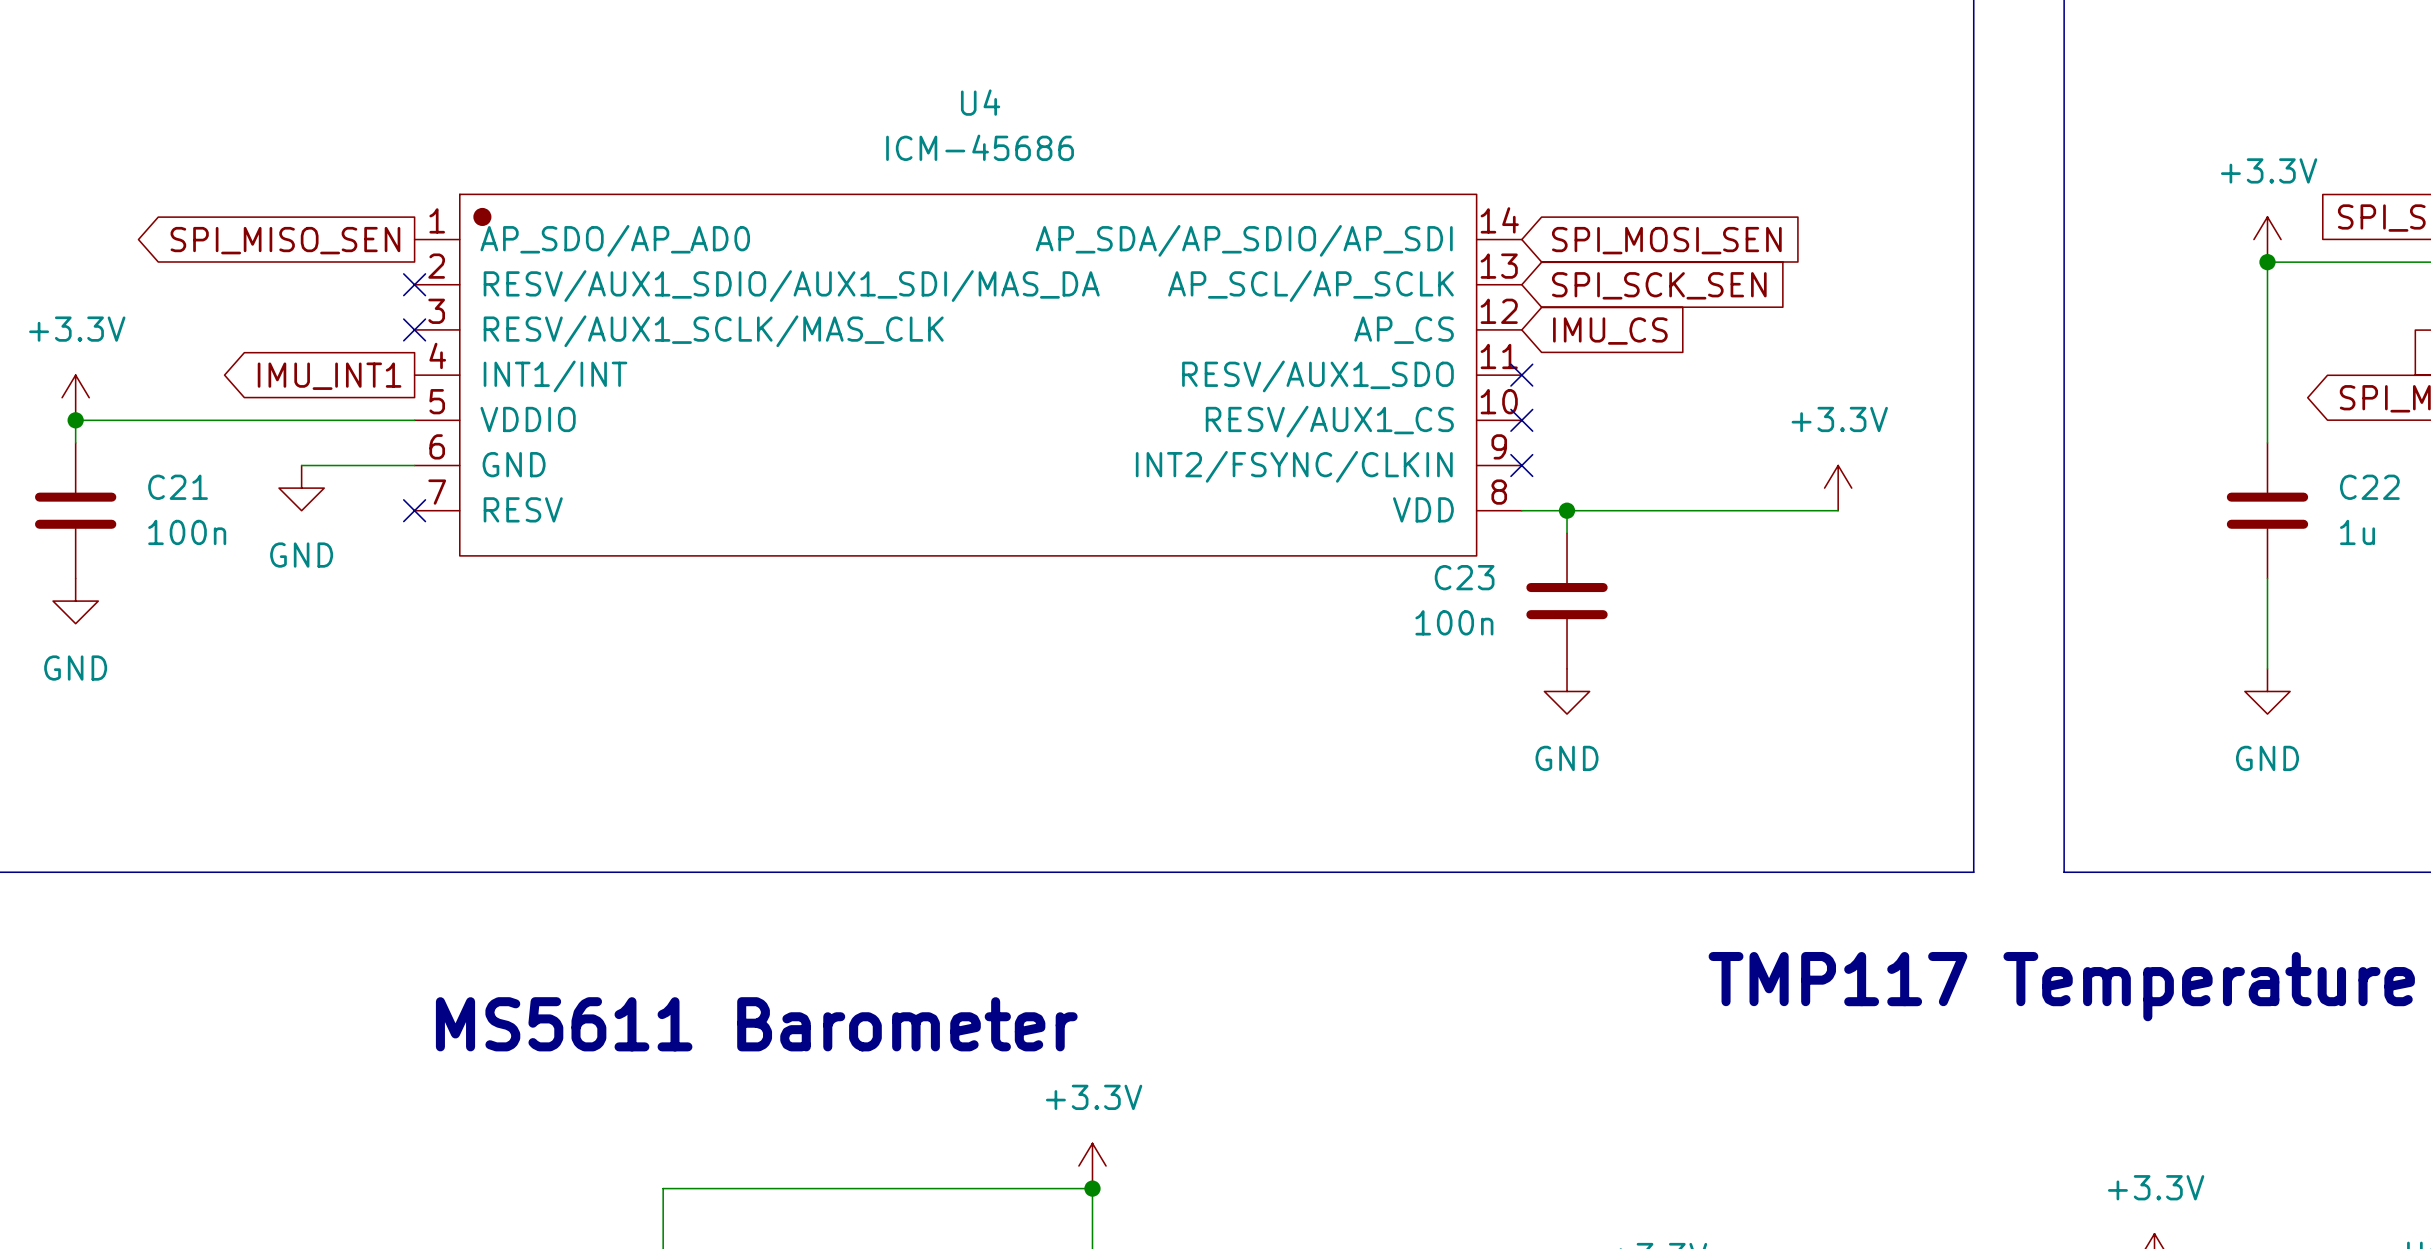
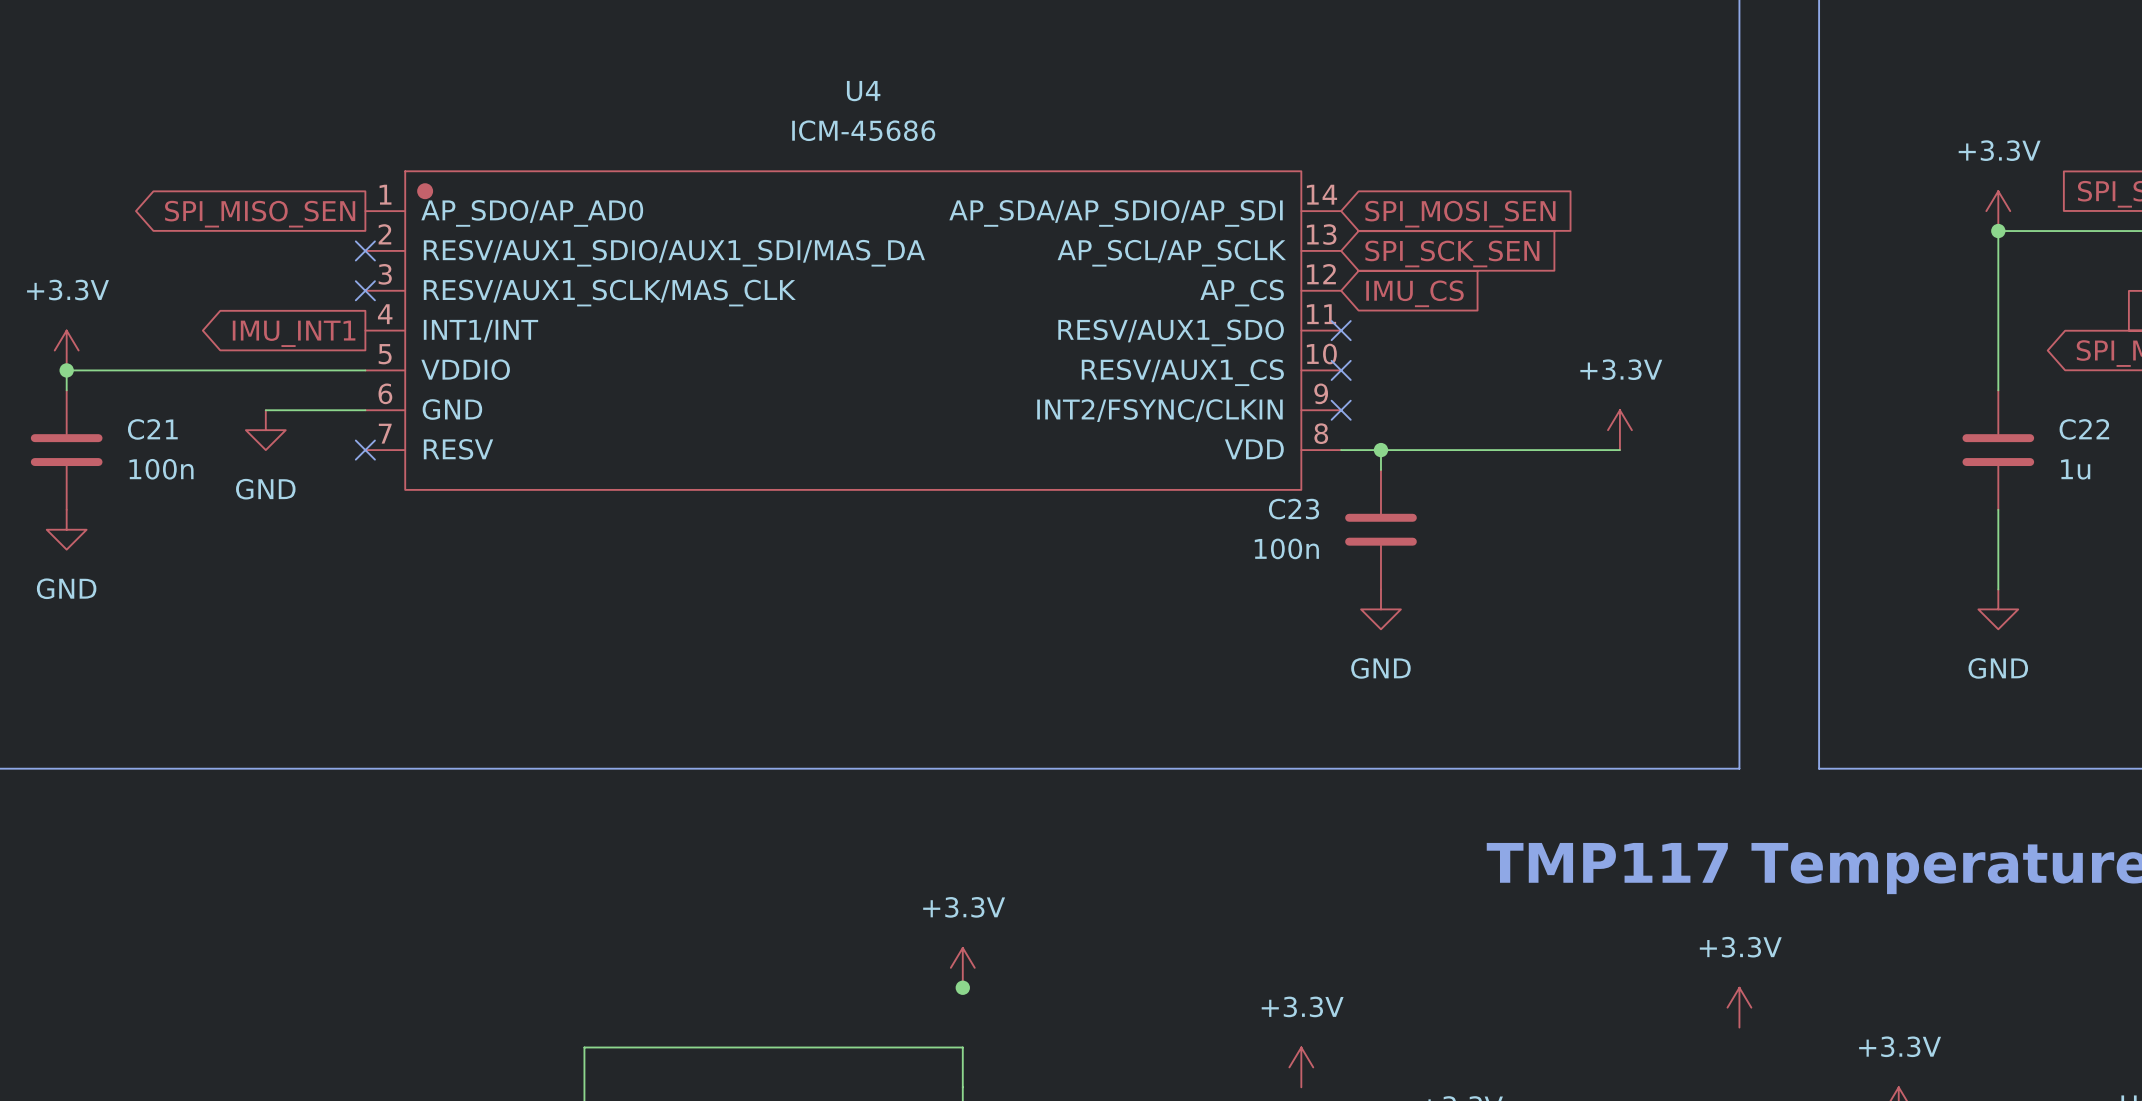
text: MS5611 Barometer (756, 1024) -> none
power symbol: none -> +3.3V (1739, 1007)
power symbol position: +3.3V (1092, 1166) -> +3.3V (962, 967)
junction position: (1092, 1188) -> (962, 987)
power symbol: none -> +3.3V (1301, 1067)

